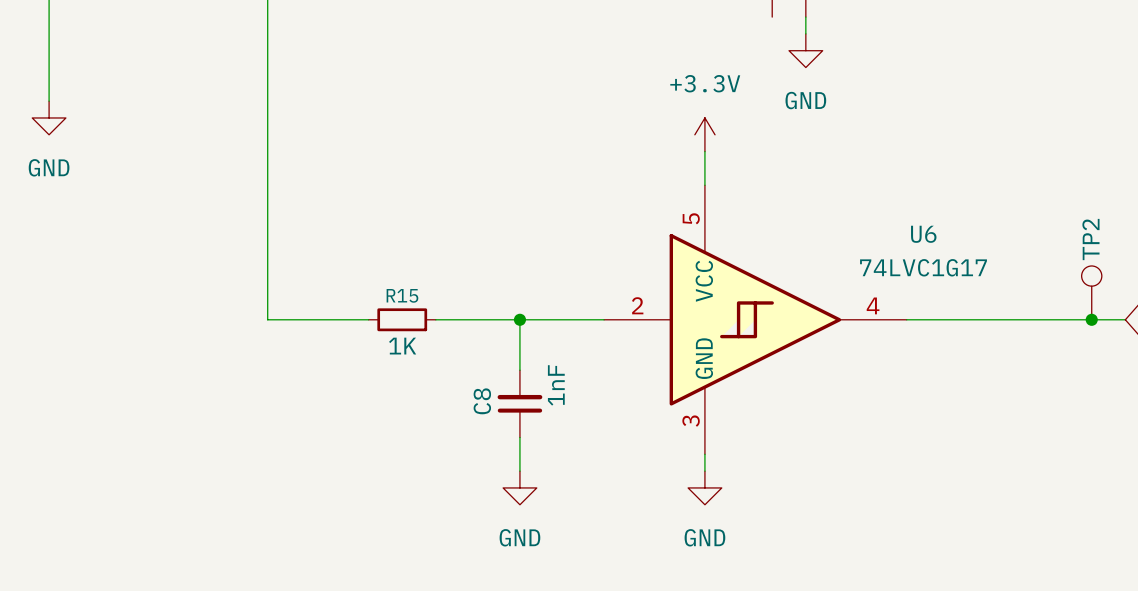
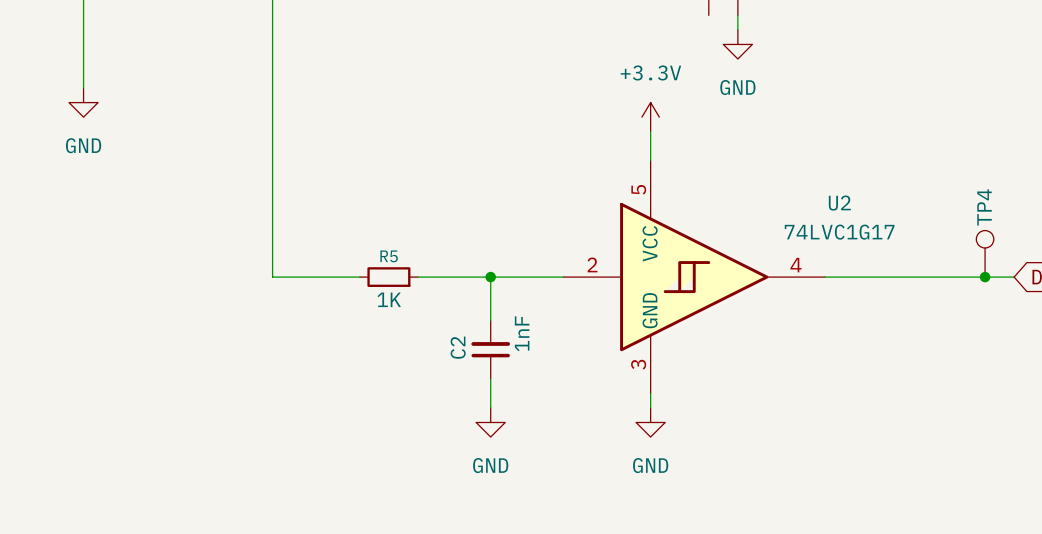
U6 name: U6 (923, 234) -> U2 (839, 203)
TP2 name: TP2 (1090, 239) -> TP4 (984, 207)
R15 name: R15 (402, 295) -> R5 (389, 256)
C8 name: C8 (482, 401) -> C2 (458, 347)

